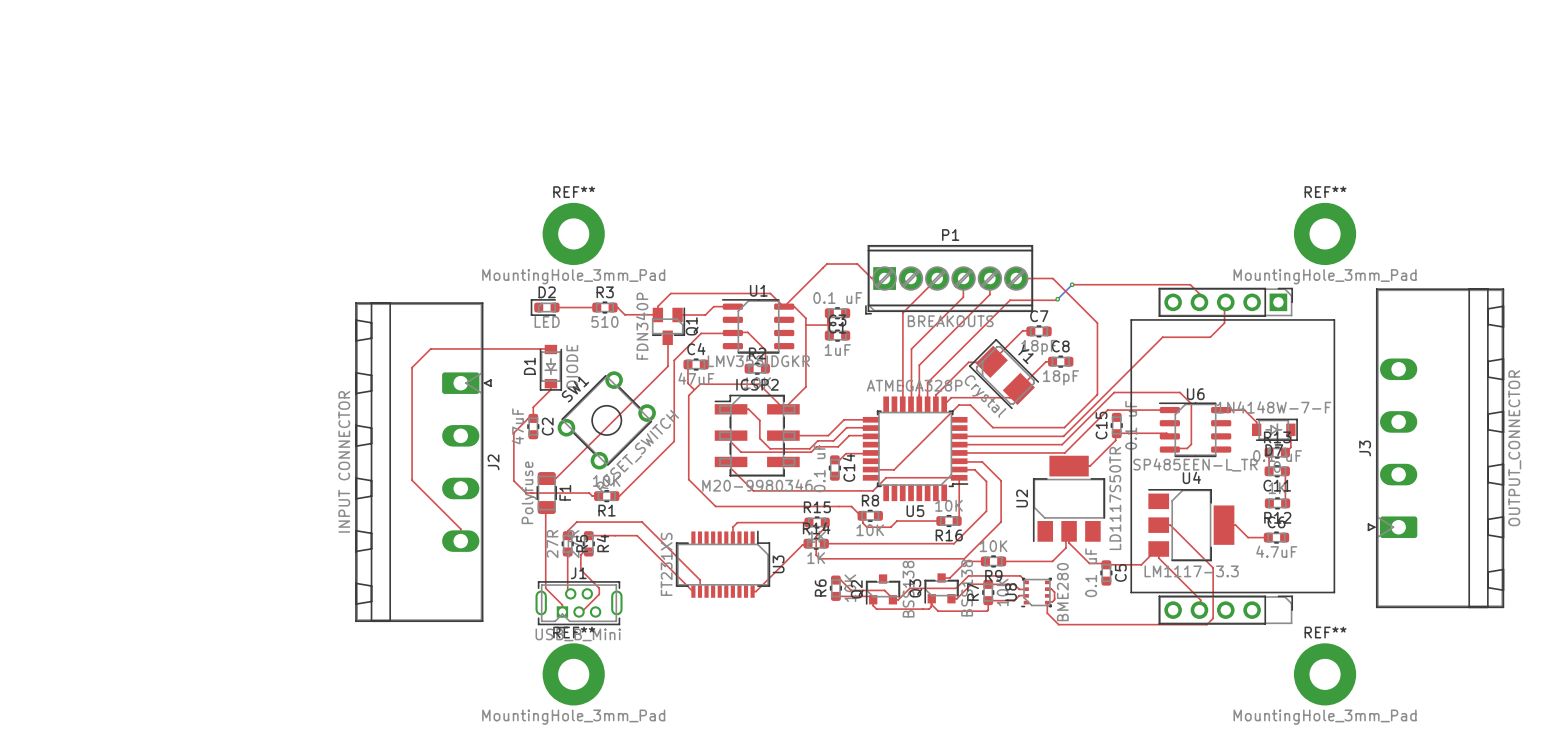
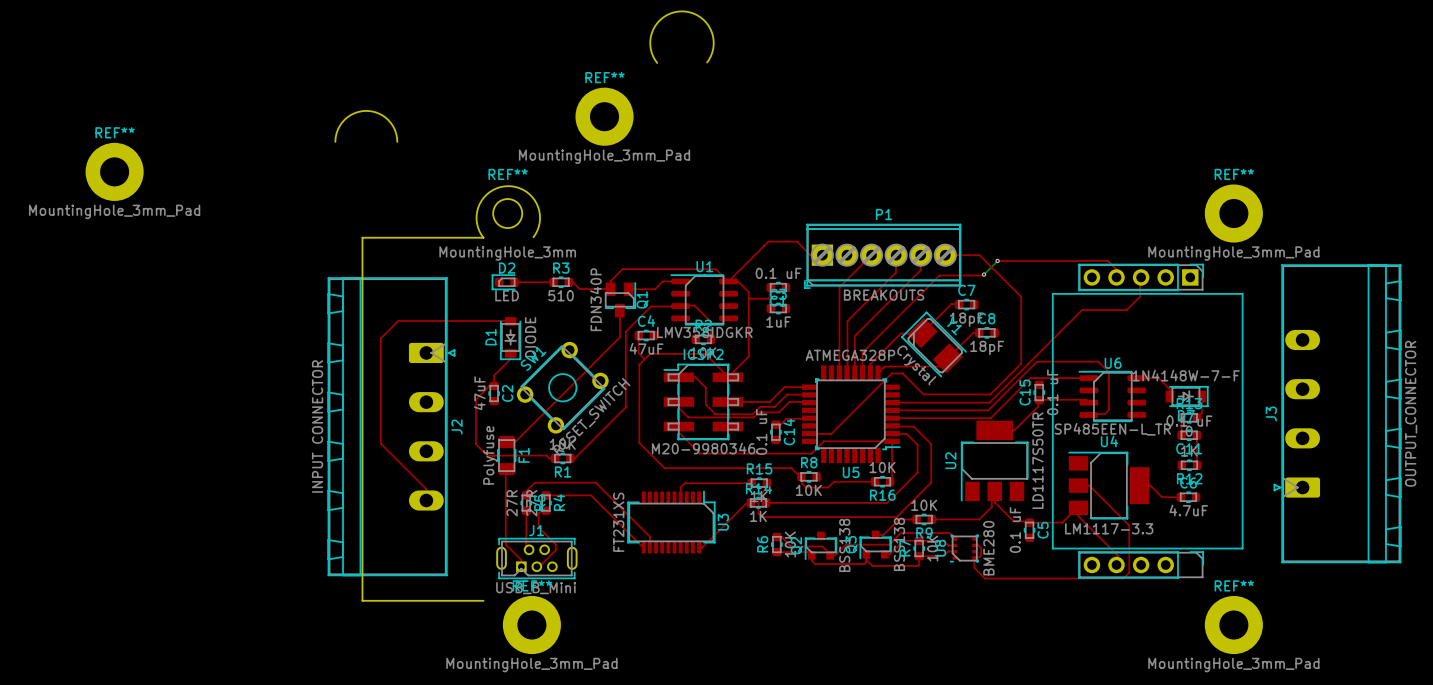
board edge: none -> (707, 62) (713, 48) (710, 28) (696, 15) (681, 11) (663, 17) (653, 29) (650, 48) (657, 62)
board edge: none -> (335, 141) (337, 130) (344, 119) (354, 113) (366, 110) (378, 113) (388, 119) (394, 130) (397, 141)
REF**: none -> MountingHole_3mm_Pad (114, 171)
REF**: none -> MountingHole_3mm (507, 213)
REF** position: (573, 233) -> (604, 116)
board edge: none -> (533, 237) (539, 222) (536, 203) (523, 189) (507, 186) (492, 190) (479, 204) (477, 223) (483, 237) (362, 237) (362, 600) (483, 600)

